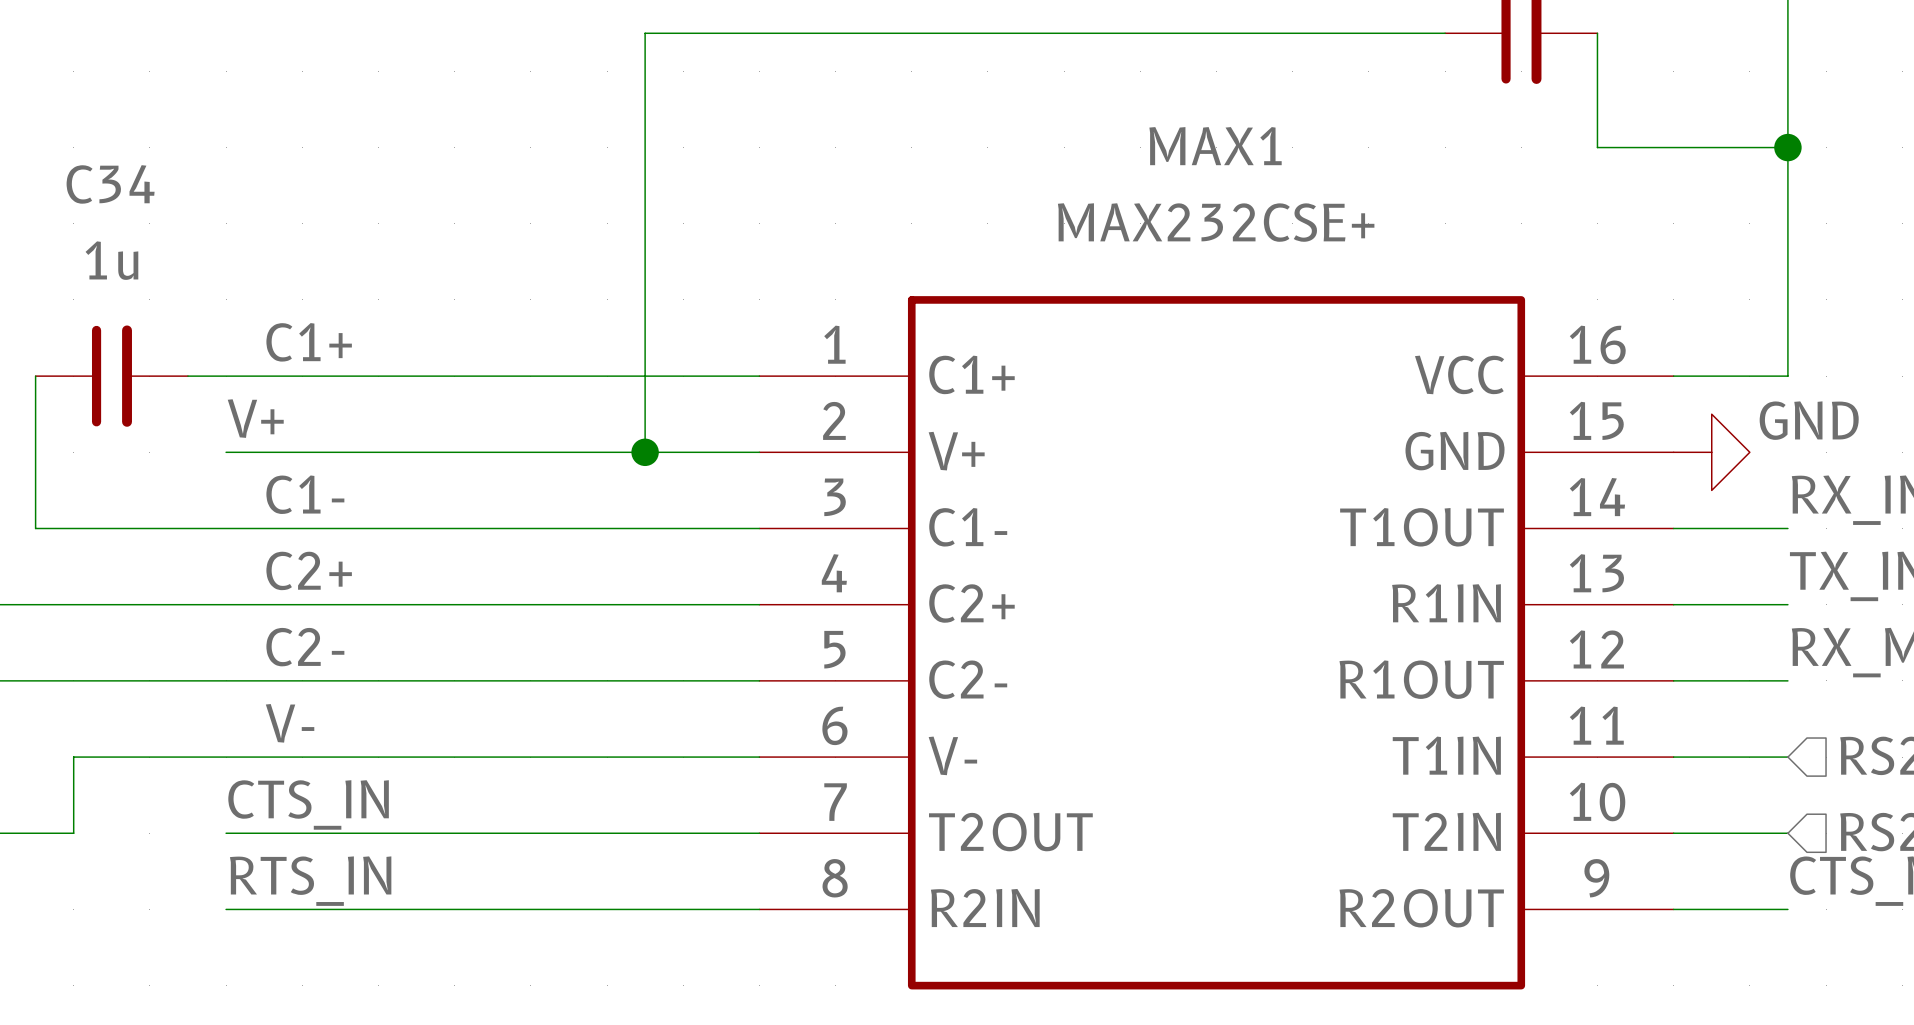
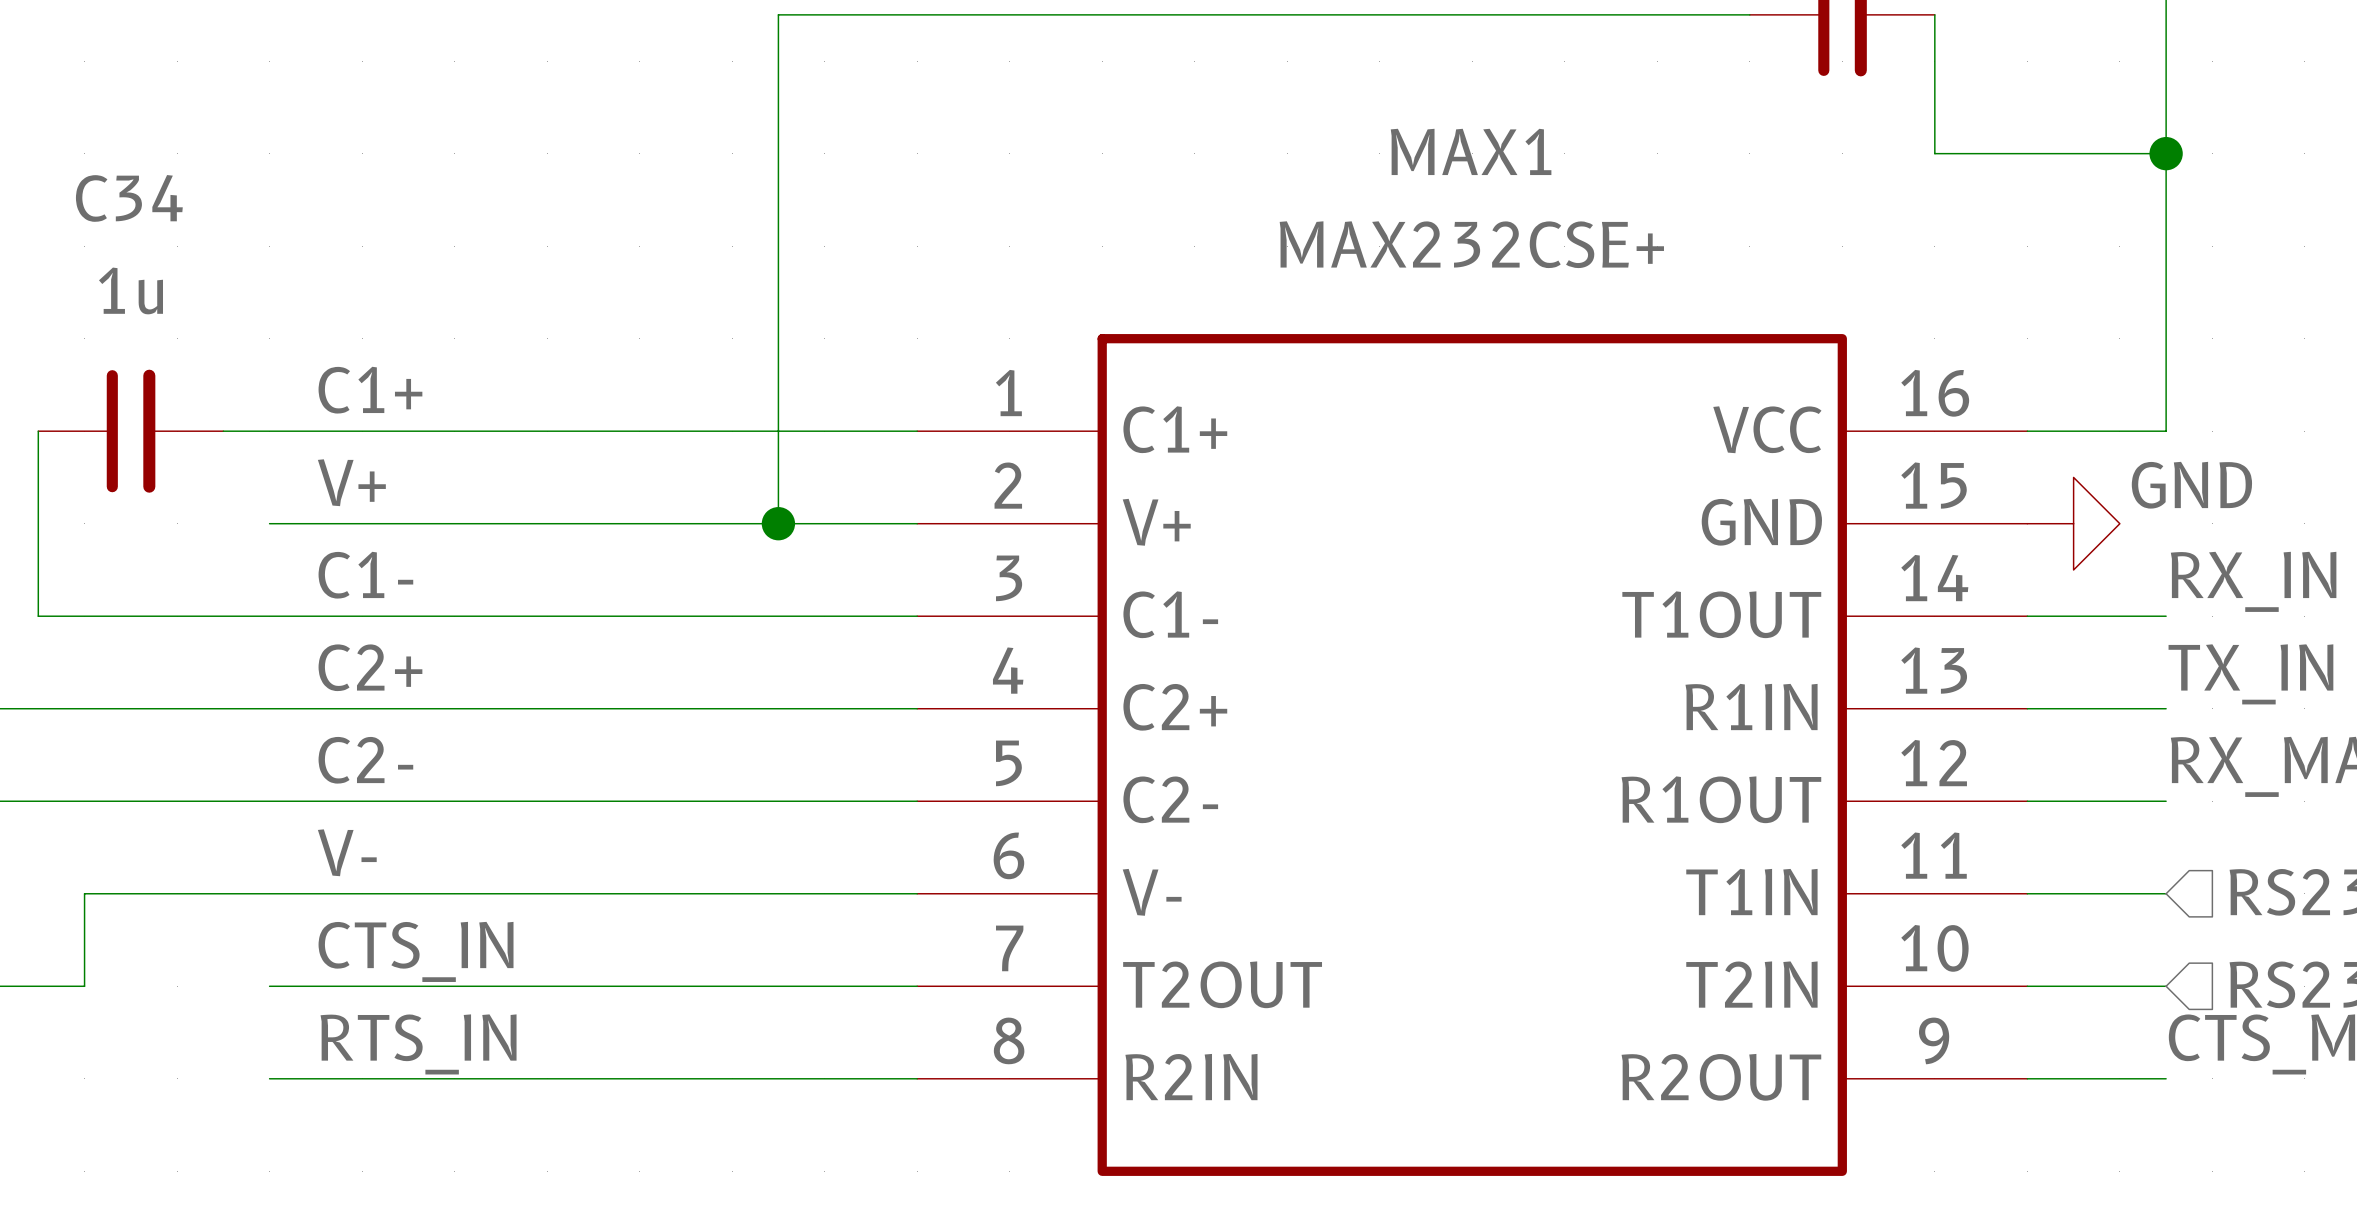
label position: V+ (255, 418) -> V+ (351, 482)
label position: CTS_IN (308, 804) -> CTS_IN (416, 951)
label position: RTS_IN (310, 881) -> RTS_IN (418, 1044)

